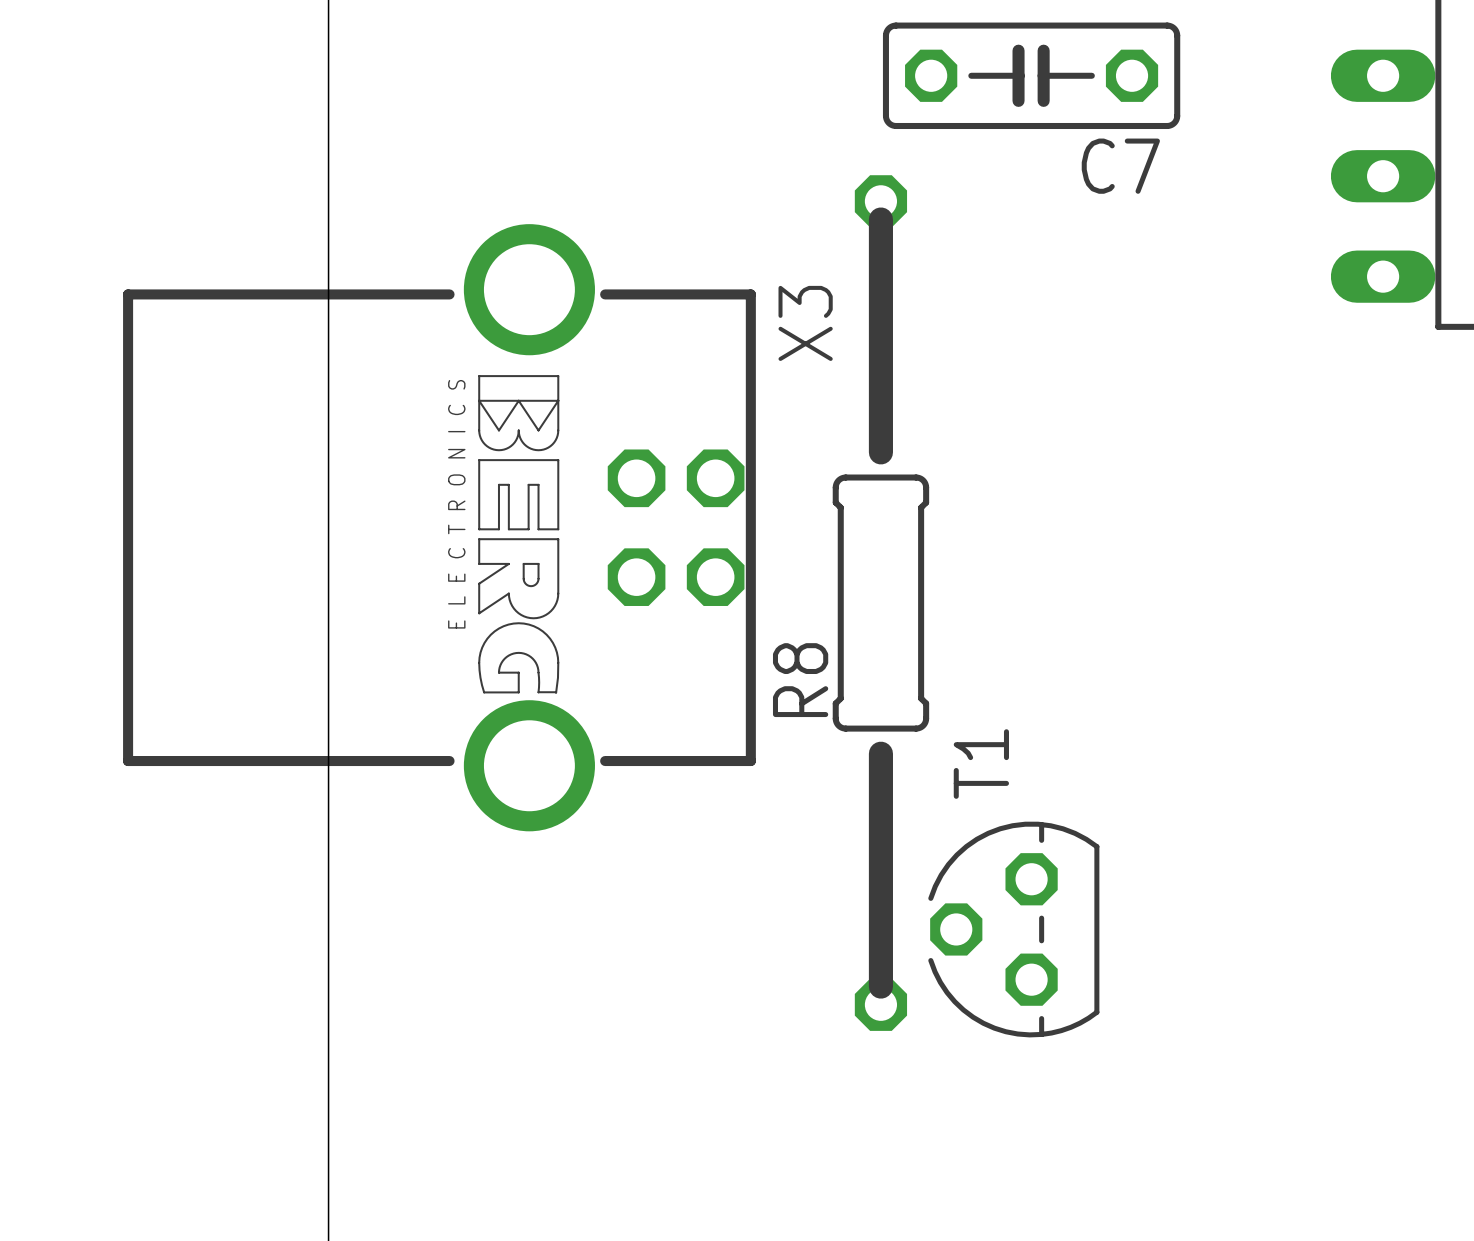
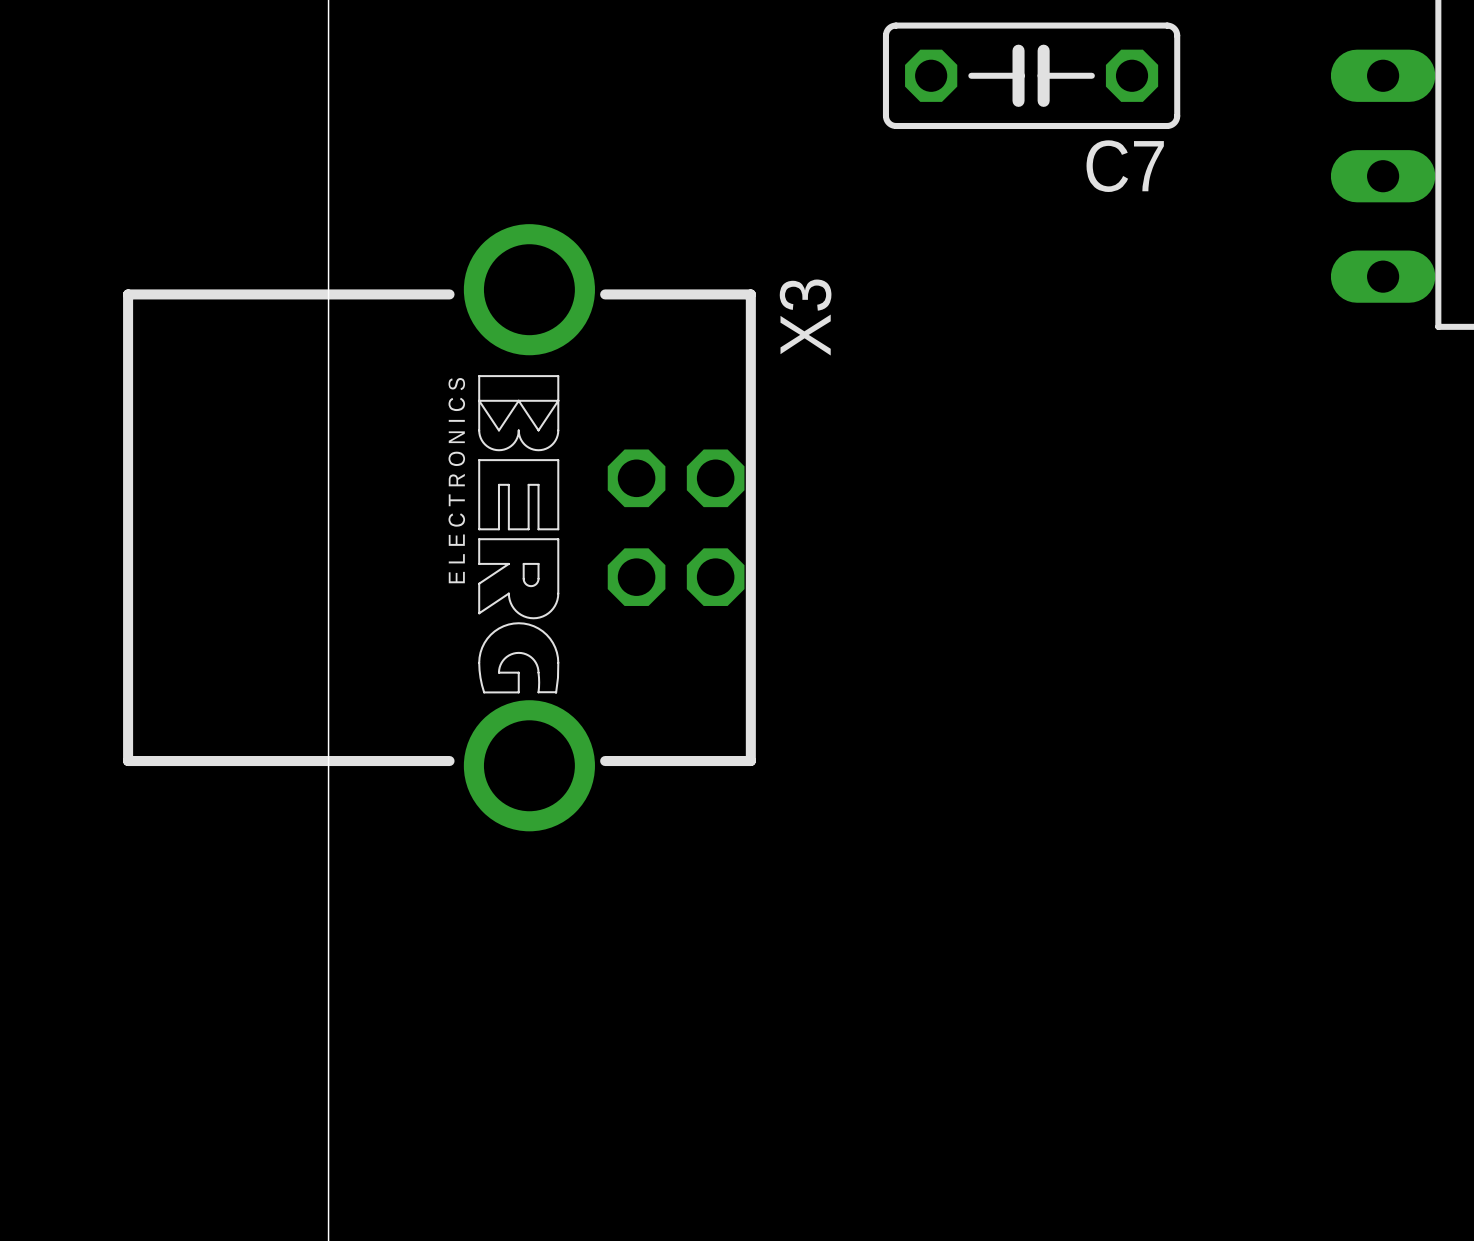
R8: (880, 603) -> none
T1: (1013, 929) -> none

